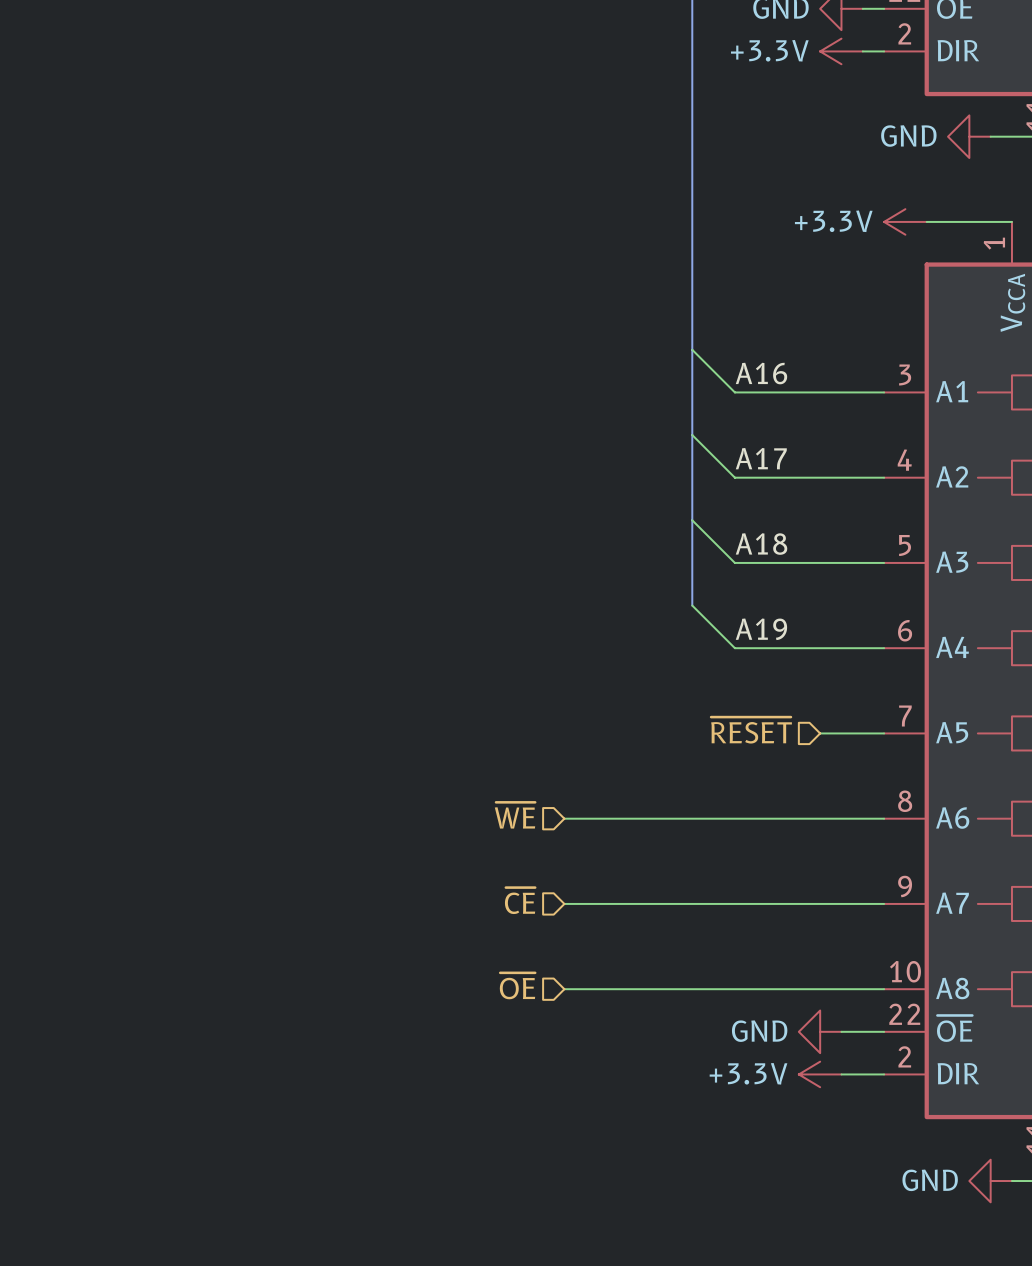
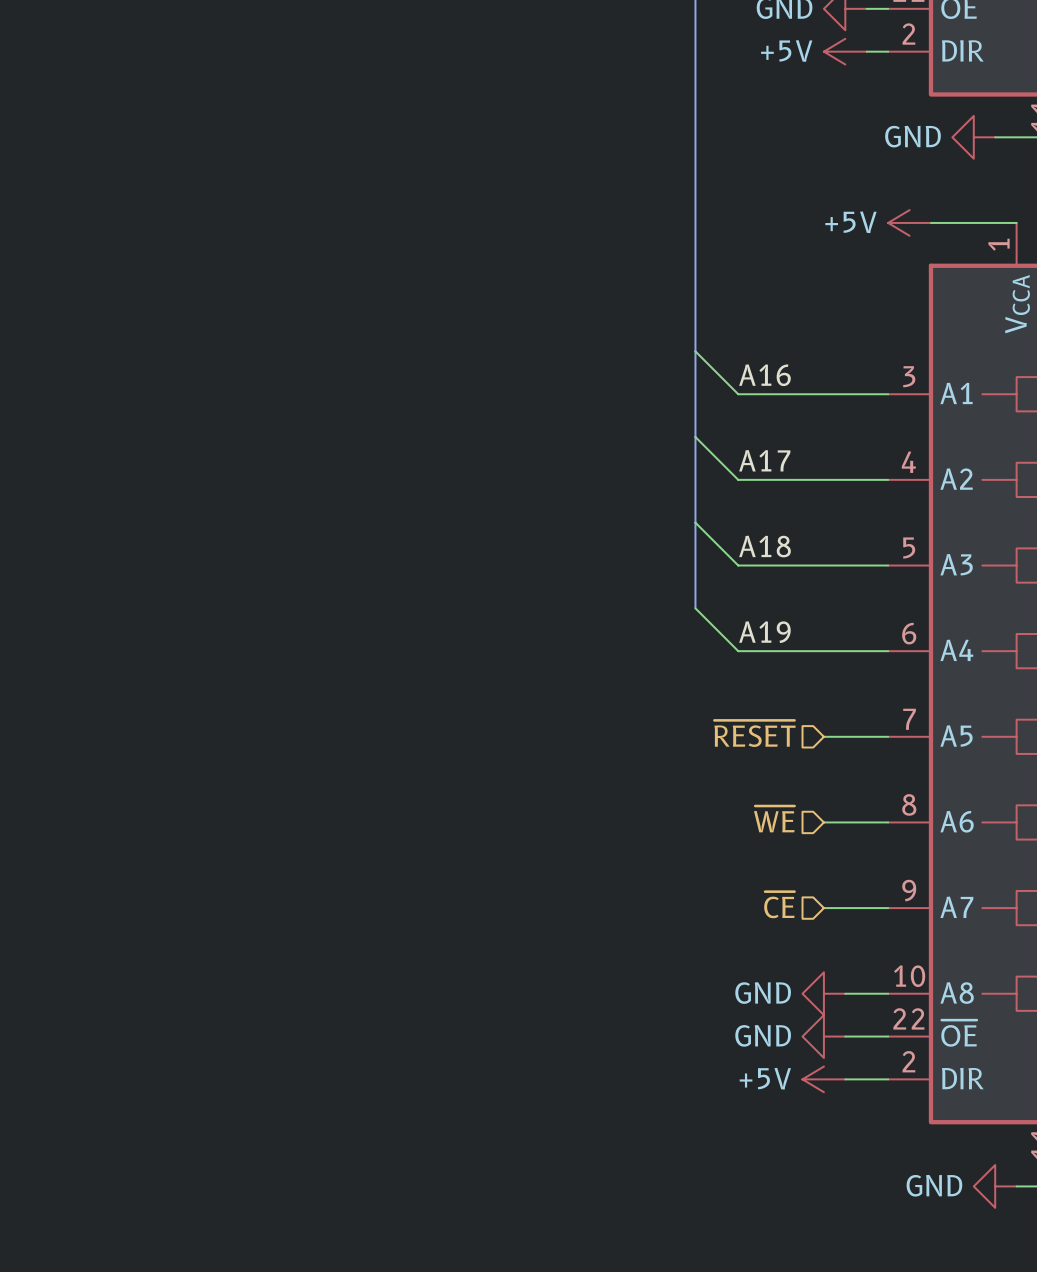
power symbol: +3.3V (841, 51) -> +5V (845, 51)
power symbol: +3.3V (905, 221) -> +5V (909, 222)
hierarchical label position: ~{WE} (515, 815) -> ~{WE} (774, 819)
wire: (564, 818) (820, 818) -> none
hierarchical label position: ~{CE} (520, 900) -> ~{CE} (779, 904)
wire: (564, 903) (820, 903) -> none
hierarchical label: ~{OE} (517, 986) -> none
wire: (564, 989) (841, 989) -> none
power symbol: none -> GND (823, 993)
power symbol: +3.3V (820, 1074) -> +5V (823, 1079)

